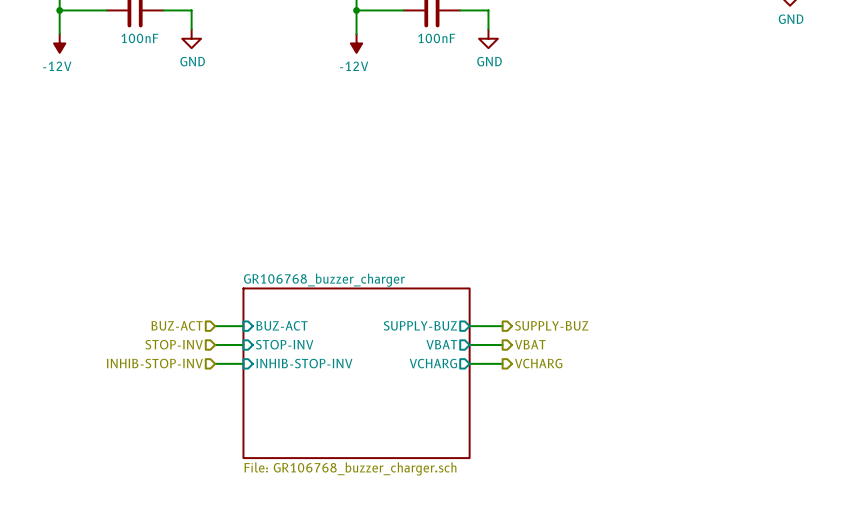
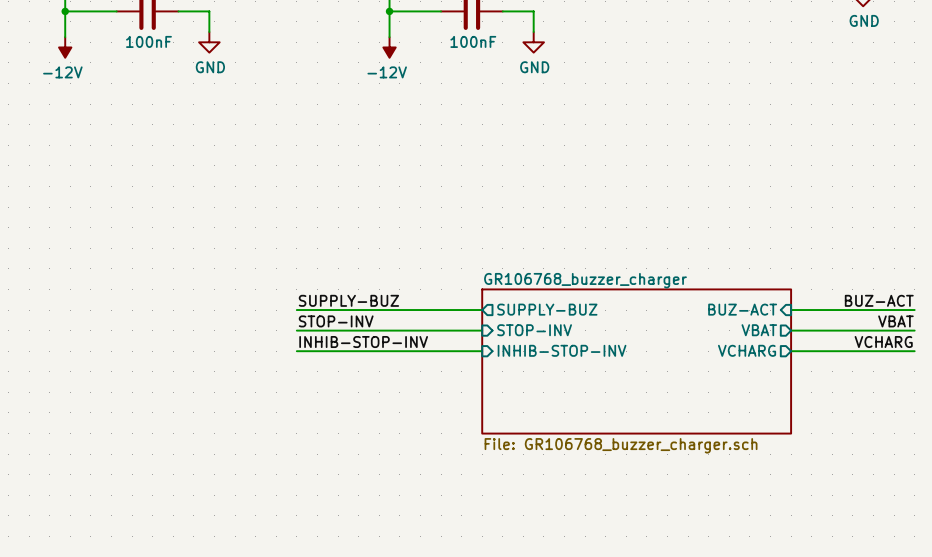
label: none -> SUPPLY-BUZ (348, 300)
label: none -> BUZ-ACT (879, 300)
sheet GR106768_buzzer_charger name position: GR106768_buzzer_charger (324, 280) -> GR106768_buzzer_charger (585, 280)
wire: none -> (296, 310) (482, 310)
sheet pin: none -> BUZ-ACT (742, 309)
wire: none -> (791, 310) (914, 310)
sheet GR106768_buzzer_charger shape: [243, 288, 470, 459] -> [482, 289, 792, 434]
label: none -> STOP-INV (336, 321)
label: none -> VBAT (895, 321)
wire: none -> (296, 330) (482, 330)
sheet pin: none -> STOP-INV (534, 330)
sheet pin: none -> VBAT (759, 330)
wire: none -> (791, 330) (914, 330)
label: none -> INHIB-STOP-INV (363, 342)
label: none -> VCHARG (883, 342)
wire: none -> (296, 351) (482, 351)
sheet pin: none -> INHIB-STOP-INV (562, 350)
sheet pin: none -> VCHARG (747, 350)
wire: none -> (791, 351) (914, 351)
hierarchical label: BUZ-ACT (177, 325) -> none
sheet pin: BUZ-ACT (282, 325) -> none
sheet pin rotation: 0° (420, 325) -> 180° (547, 309)
sheet pin position: SUPPLY-BUZ (420, 325) -> SUPPLY-BUZ (547, 309)
hierarchical label: SUPPLY-BUZ (551, 325) -> none
wire: (215, 326) (243, 326) -> none
wire: (469, 326) (502, 326) -> none
hierarchical label: STOP-INV (174, 344) -> none
sheet pin: STOP-INV (284, 344) -> none
sheet pin: VBAT (441, 344) -> none
hierarchical label: VBAT (530, 344) -> none
wire: (215, 345) (243, 345) -> none
wire: (469, 345) (502, 345) -> none
hierarchical label: INHIB-STOP-INV (154, 363) -> none
wire: (215, 363) (243, 363) -> none
sheet pin: INHIB-STOP-INV (304, 363) -> none
sheet pin: VCHARG (433, 363) -> none
wire: (469, 363) (502, 363) -> none
hierarchical label: VCHARG (538, 363) -> none
sheet GR106768_buzzer_charger value position: File: GR106768_buzzer_charger.sch (350, 469) -> File: GR106768_buzzer_charger.sch (621, 445)

